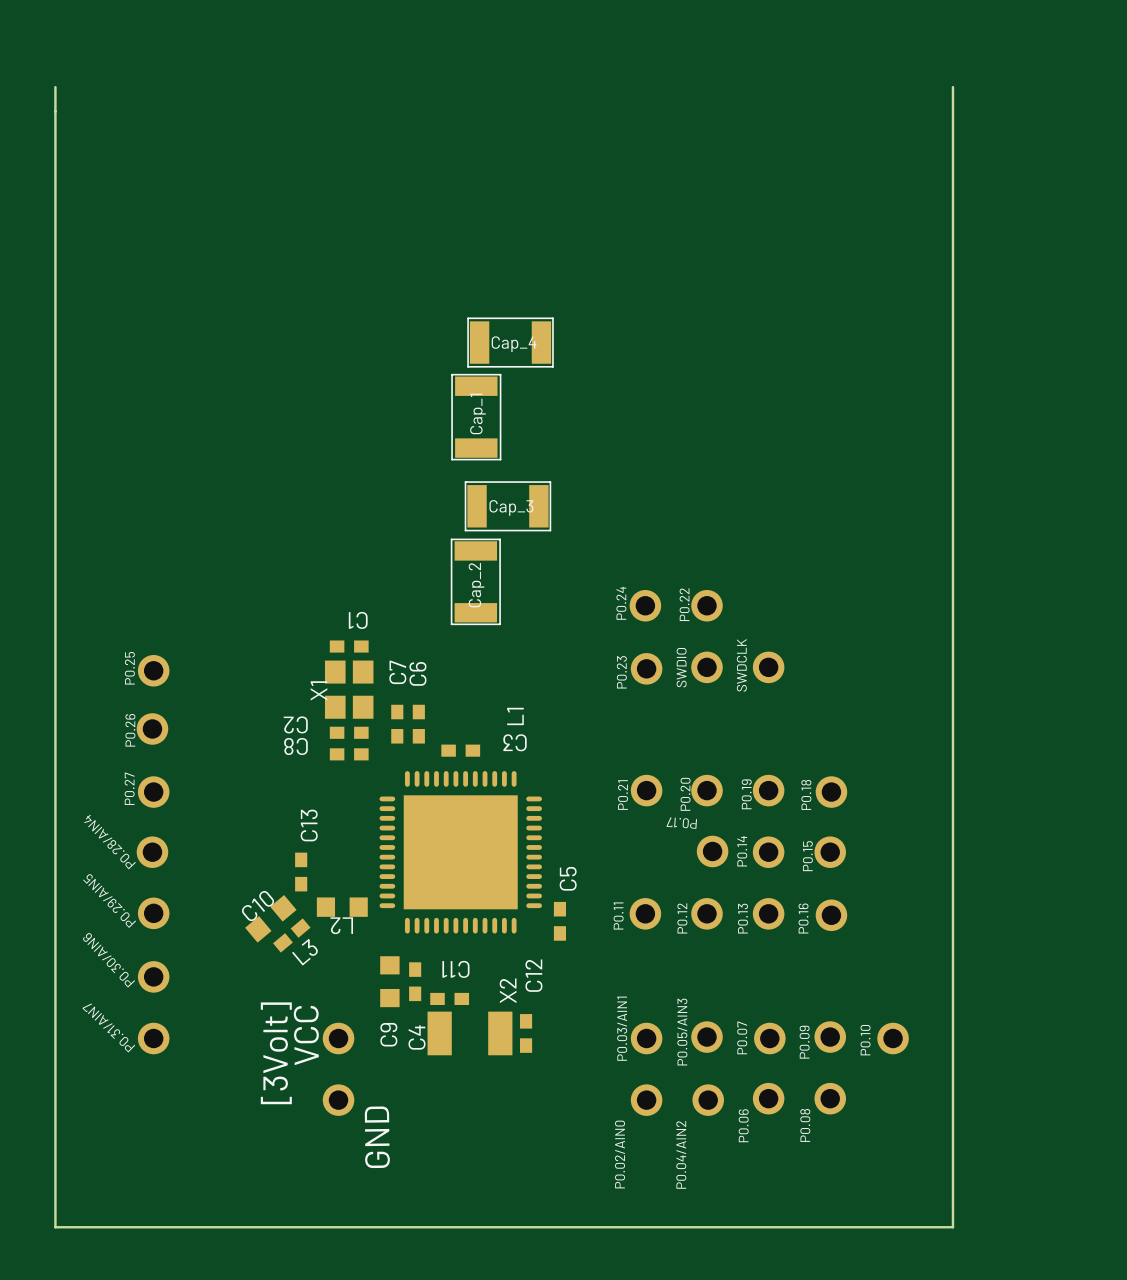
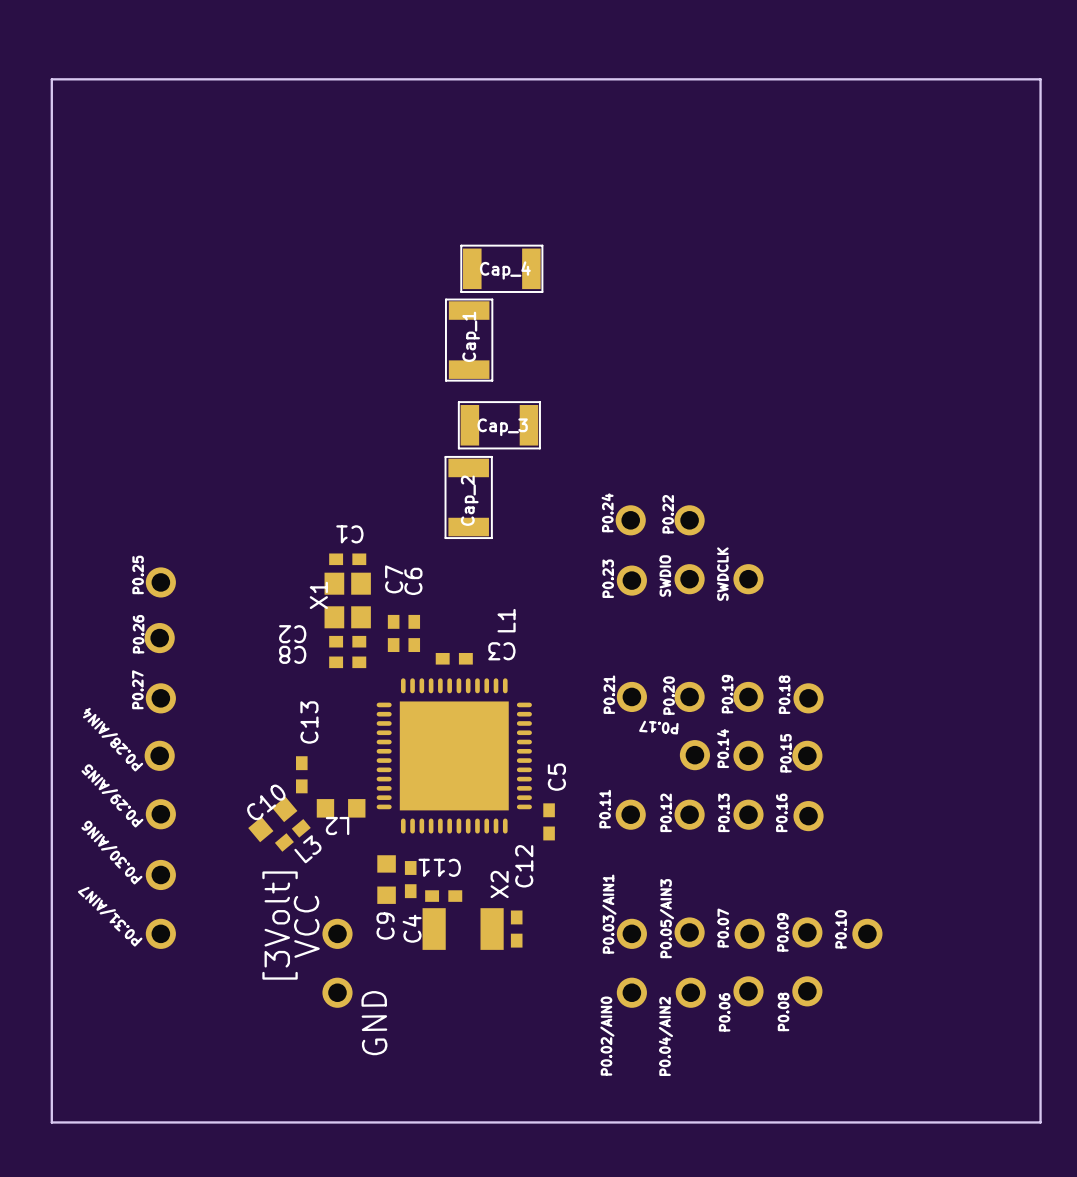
board edge: (55, 87) (55, 1227) (952, 1227) (952, 87) -> none
board edge: none -> (51, 79) (1040, 79) (1040, 1122) (51, 1122) (51, 79)

